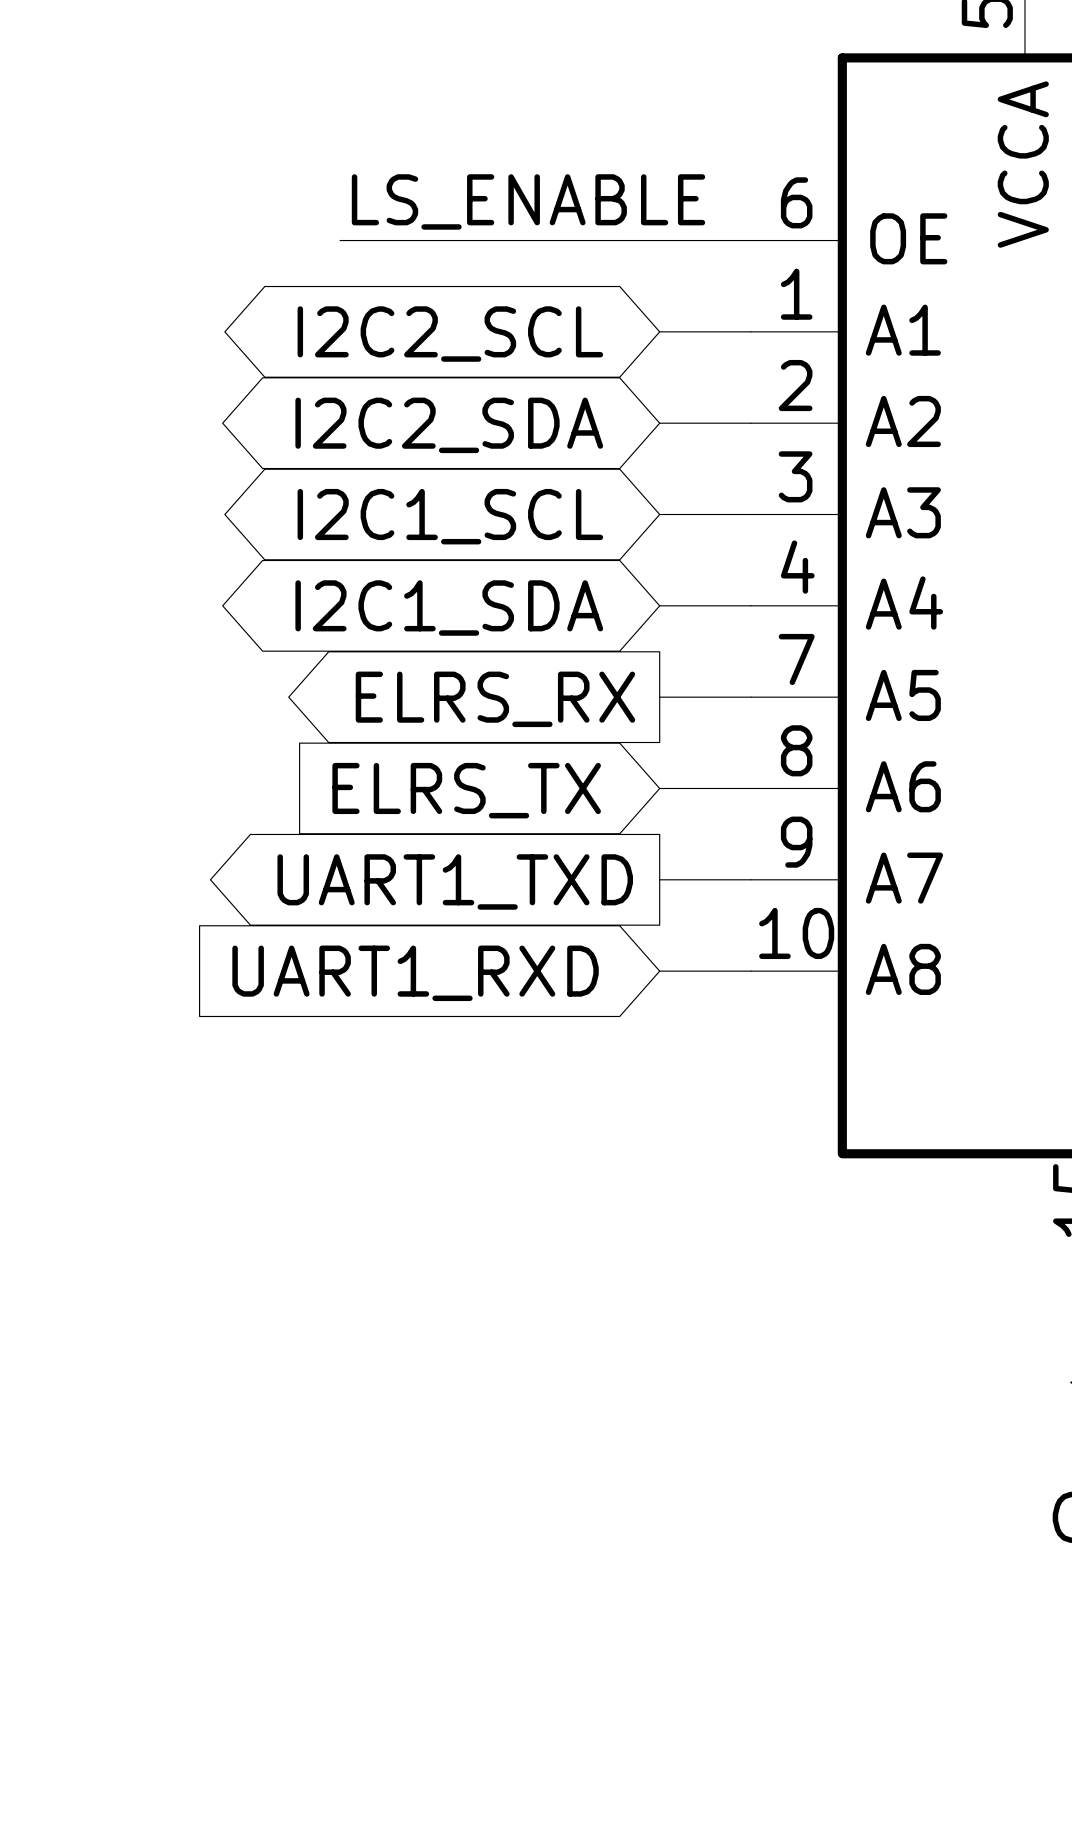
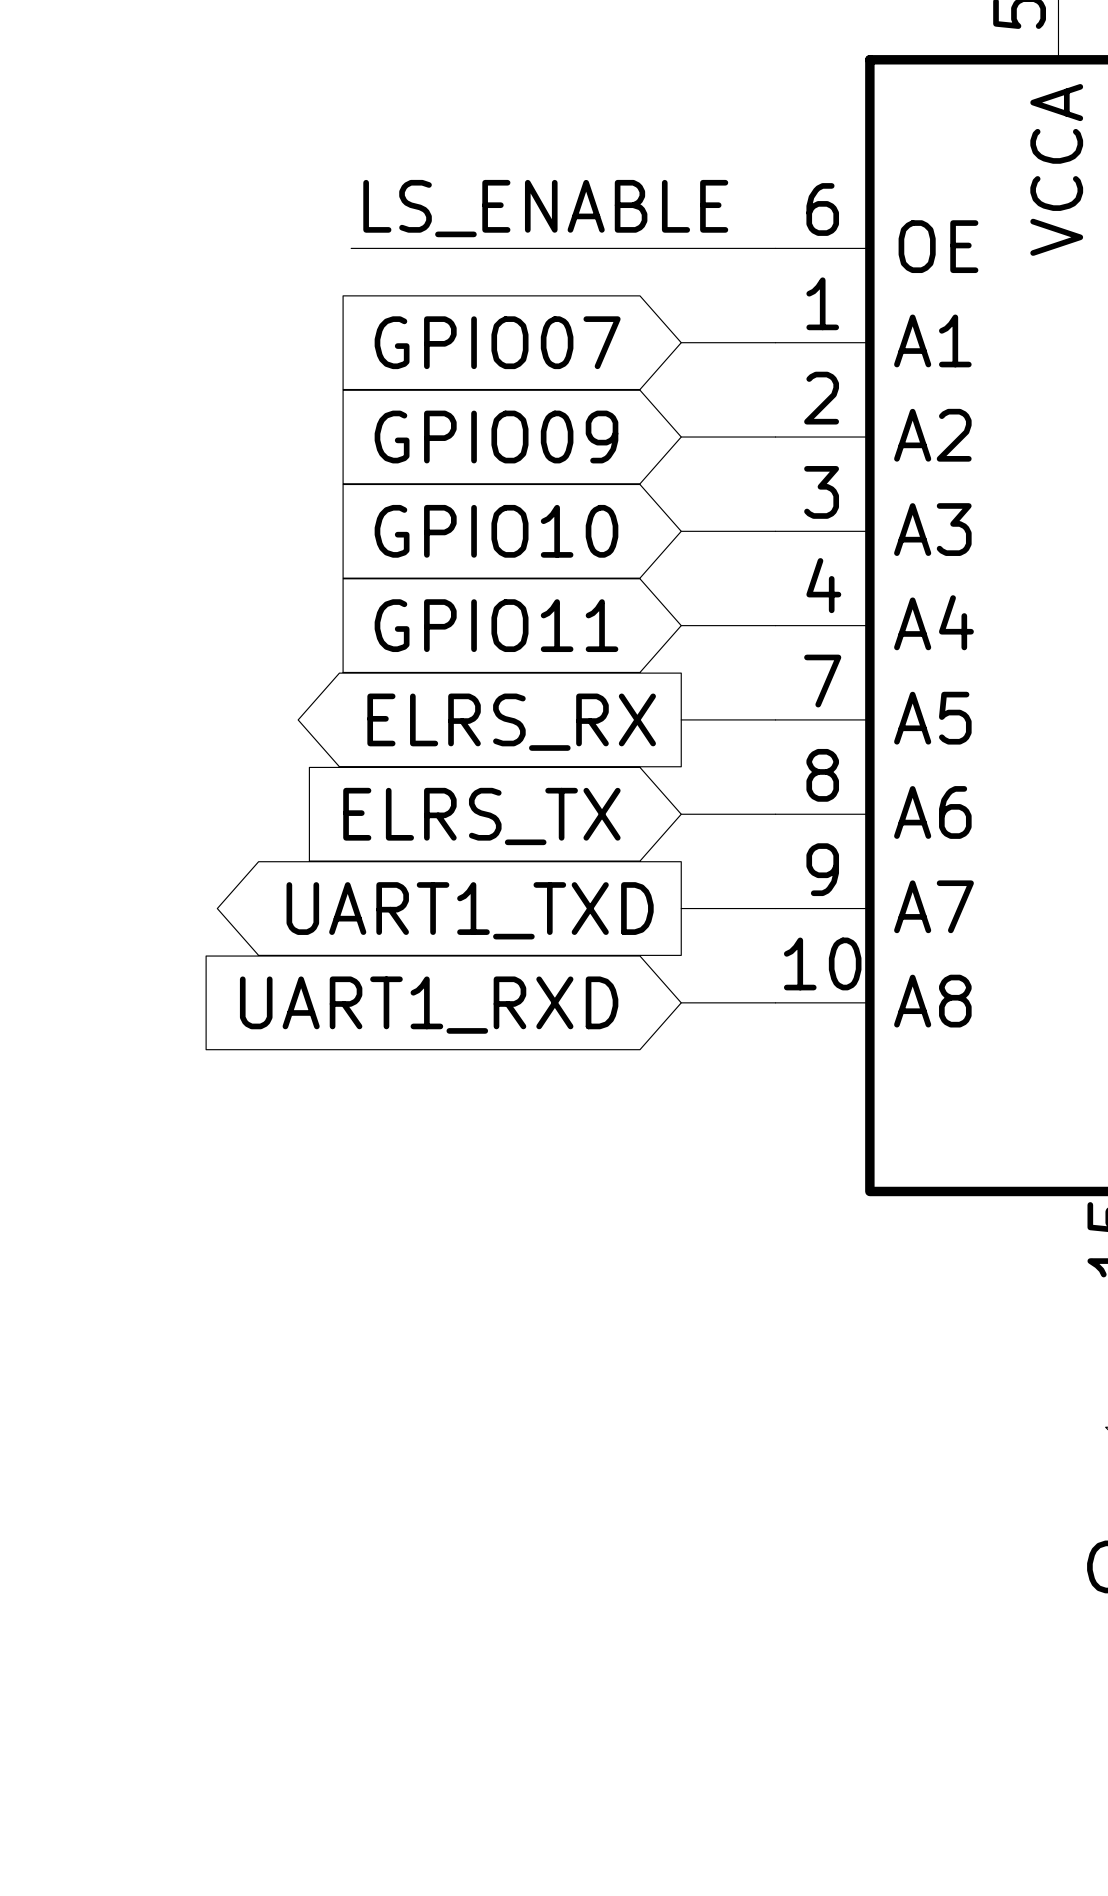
global label shape: bidirectional (450, 334) -> input (497, 342)
global label: I2C2_SCL (450, 334) -> GPIO07 (497, 342)
global label shape: bidirectional (449, 425) -> input (496, 437)
global label: I2C2_SDA (449, 425) -> GPIO09 (496, 437)
global label shape: bidirectional (450, 516) -> input (496, 531)
global label: I2C1_SCL (450, 516) -> GPIO10 (496, 531)
global label shape: bidirectional (449, 608) -> input (496, 625)
global label: I2C1_SDA (449, 608) -> GPIO11 (496, 625)

